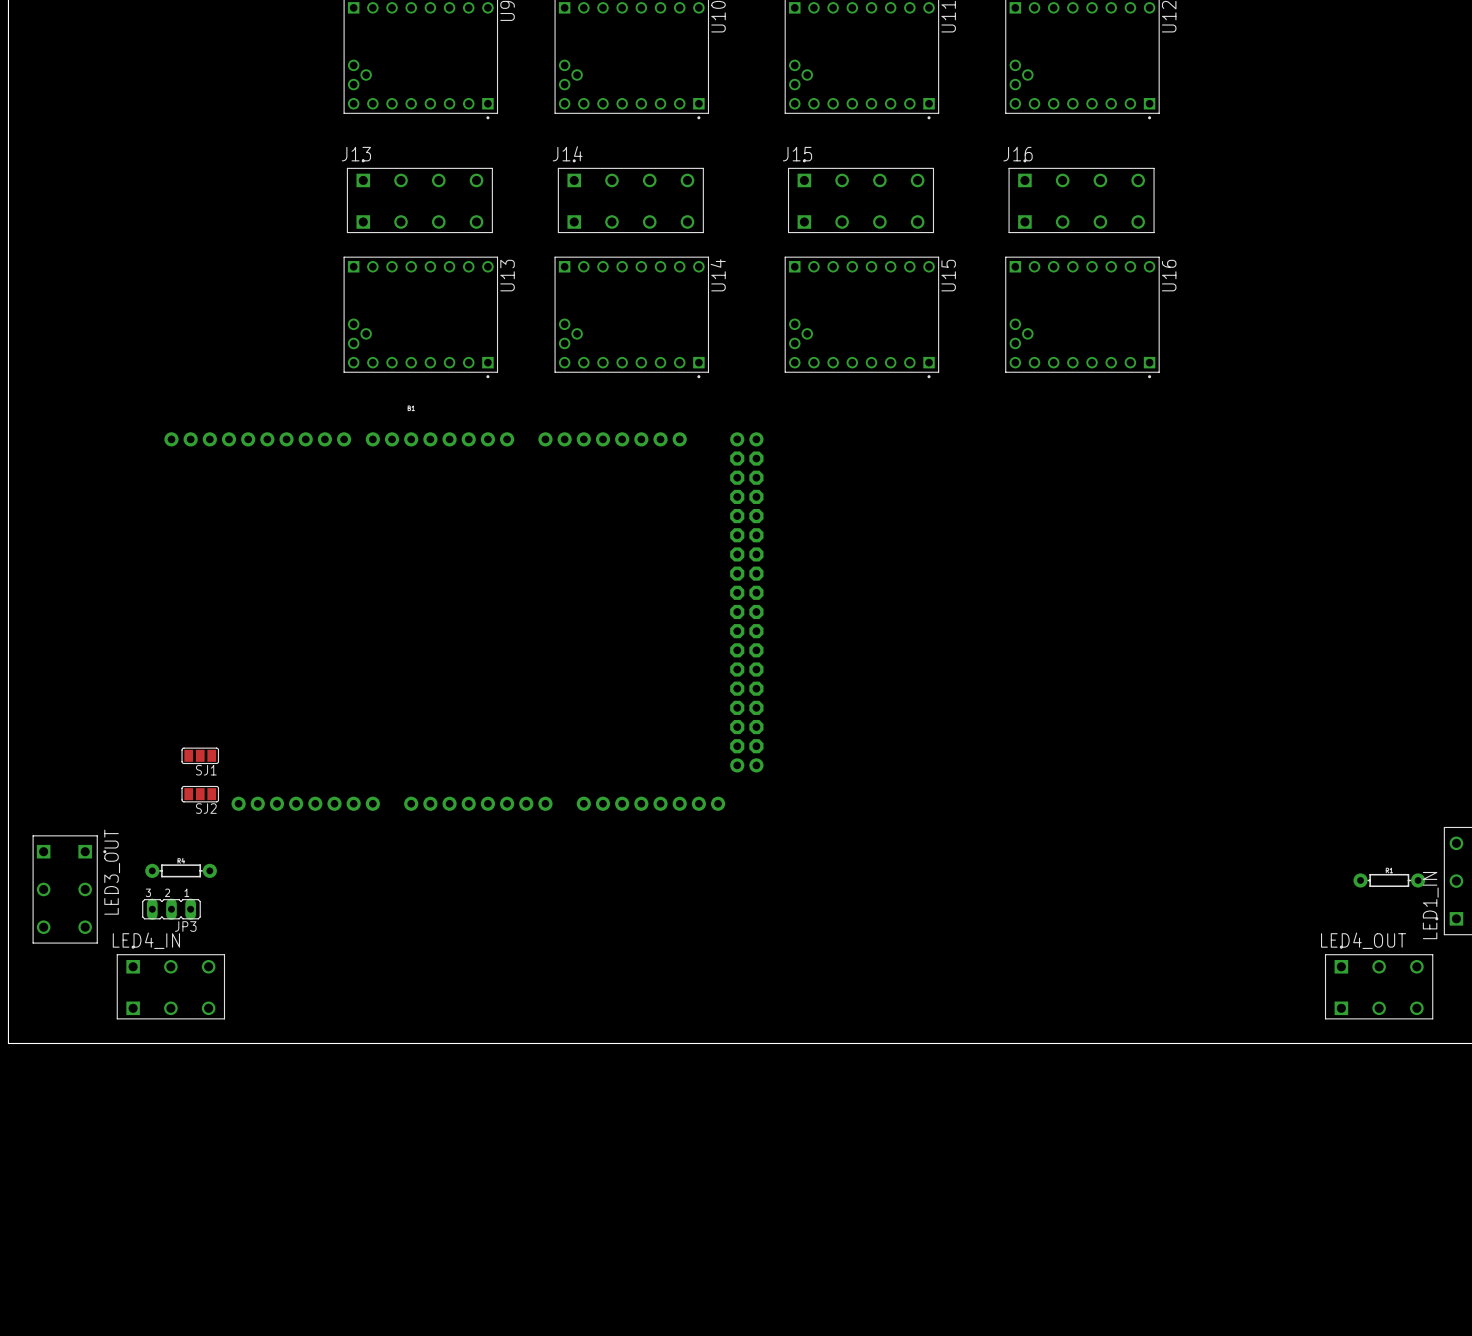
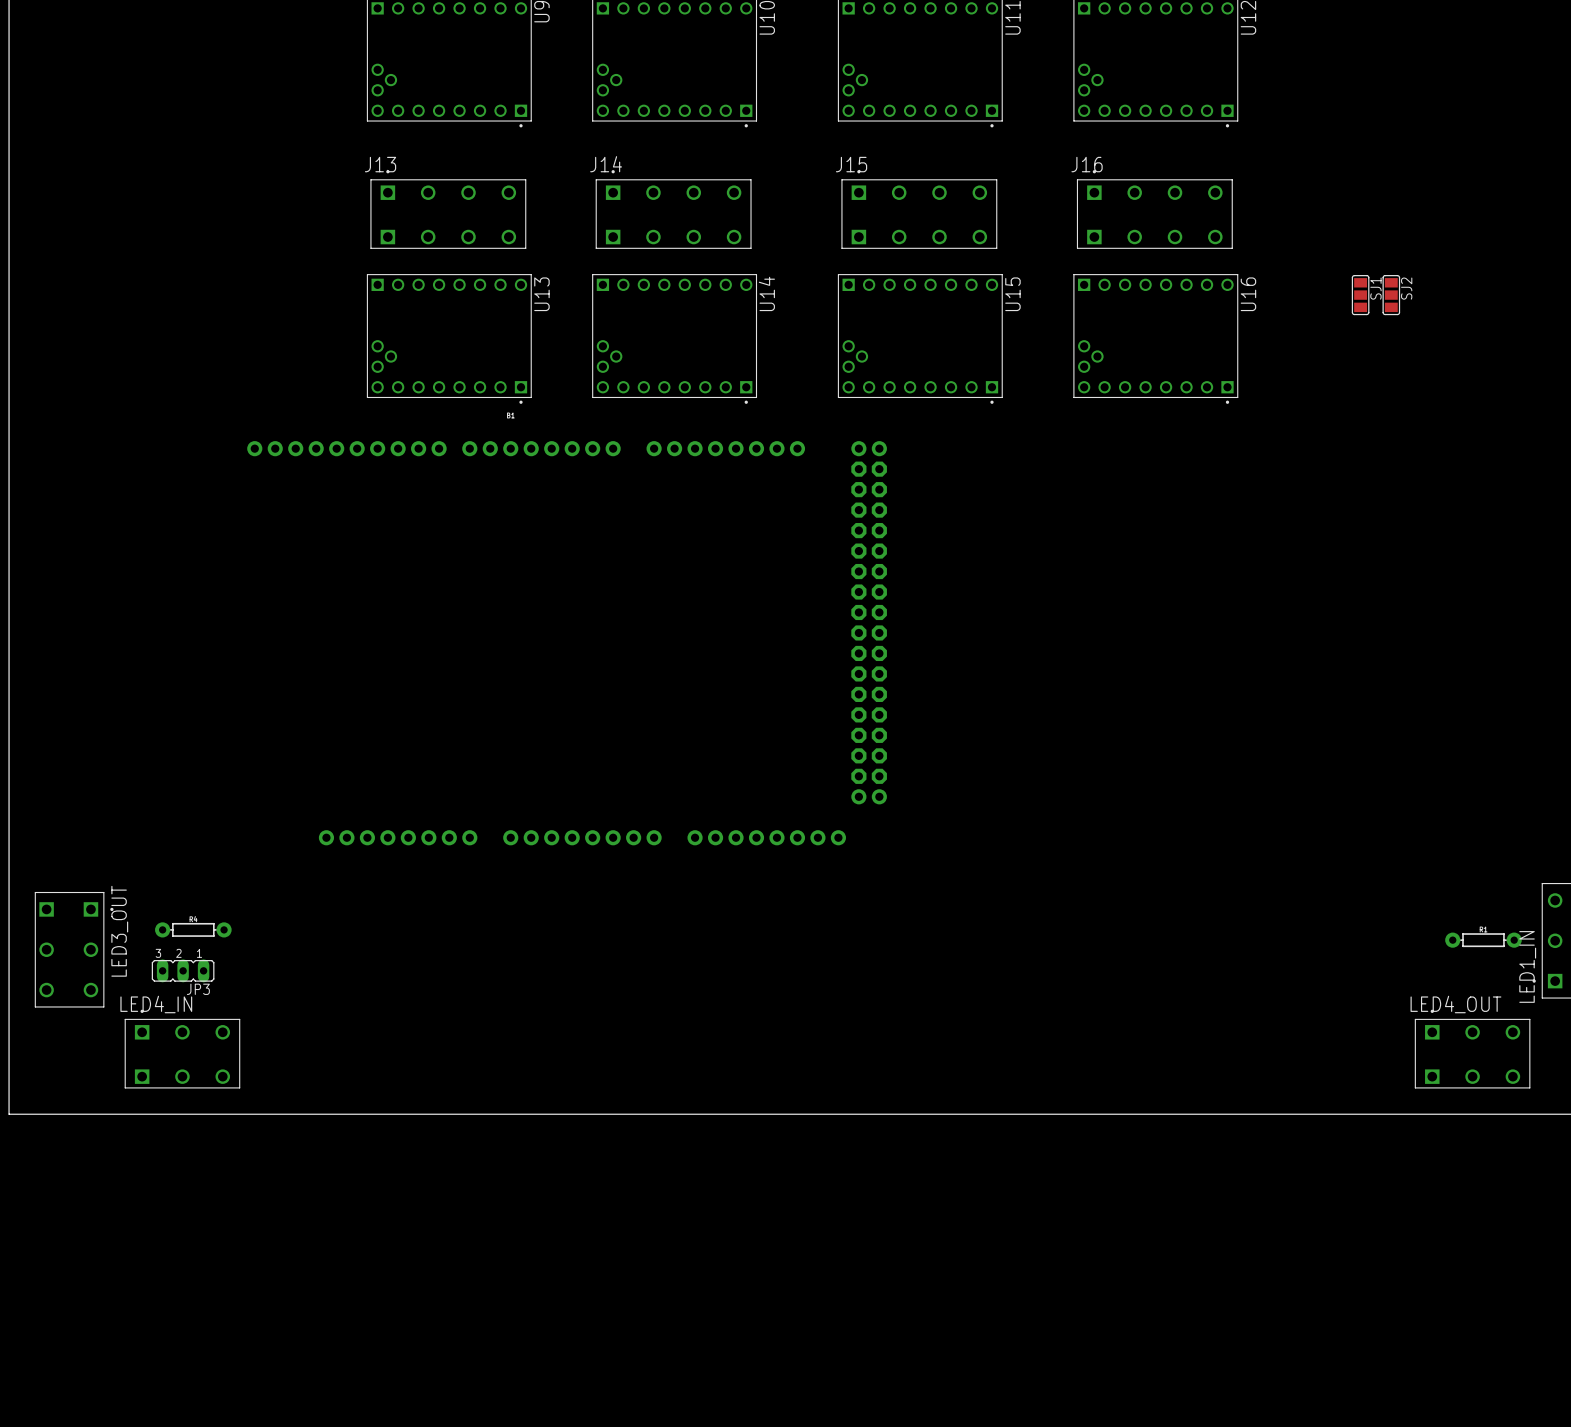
part position: (463, 621) -> (567, 643)
SJ1 rotation: 0° (200, 755) -> 90° clockwise (1360, 295)
SJ1 position: (200, 755) -> (1360, 295)
SJ1 name position: SJ1 (206, 770) -> SJ1 (1375, 288)
SJ2 rotation: 0° (200, 794) -> 90° clockwise (1391, 295)
SJ2 position: (200, 794) -> (1391, 295)
SJ2 name position: SJ2 (206, 808) -> SJ2 (1406, 288)

